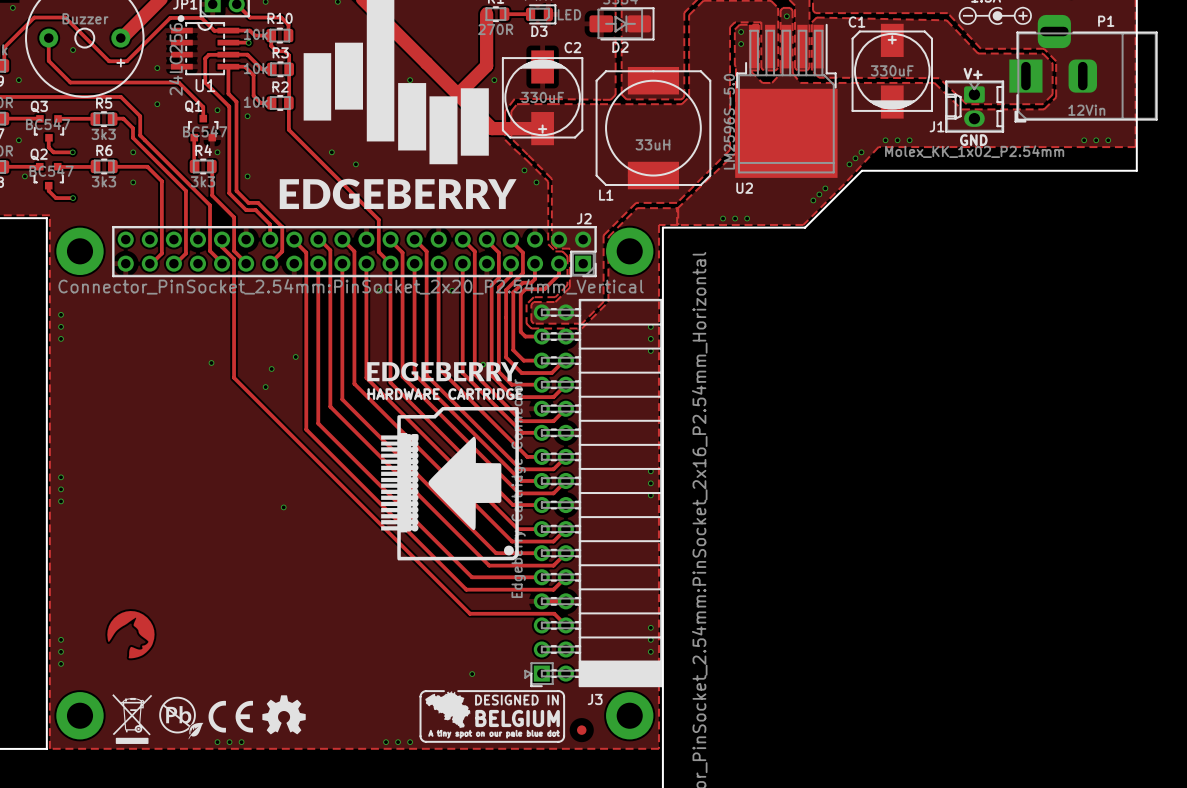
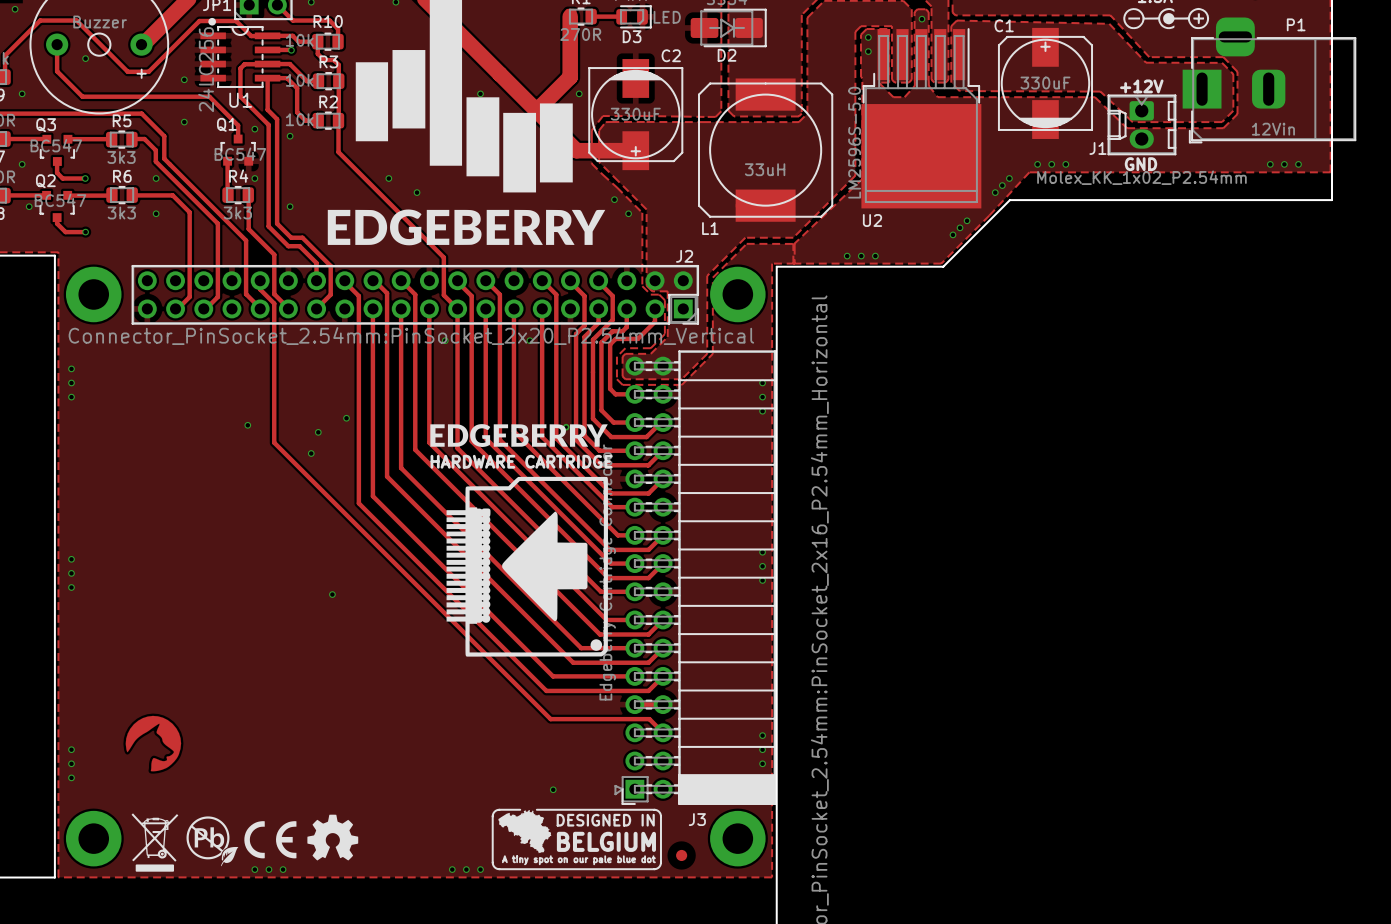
text: V+ (973, 73) -> +12V (1141, 86)

